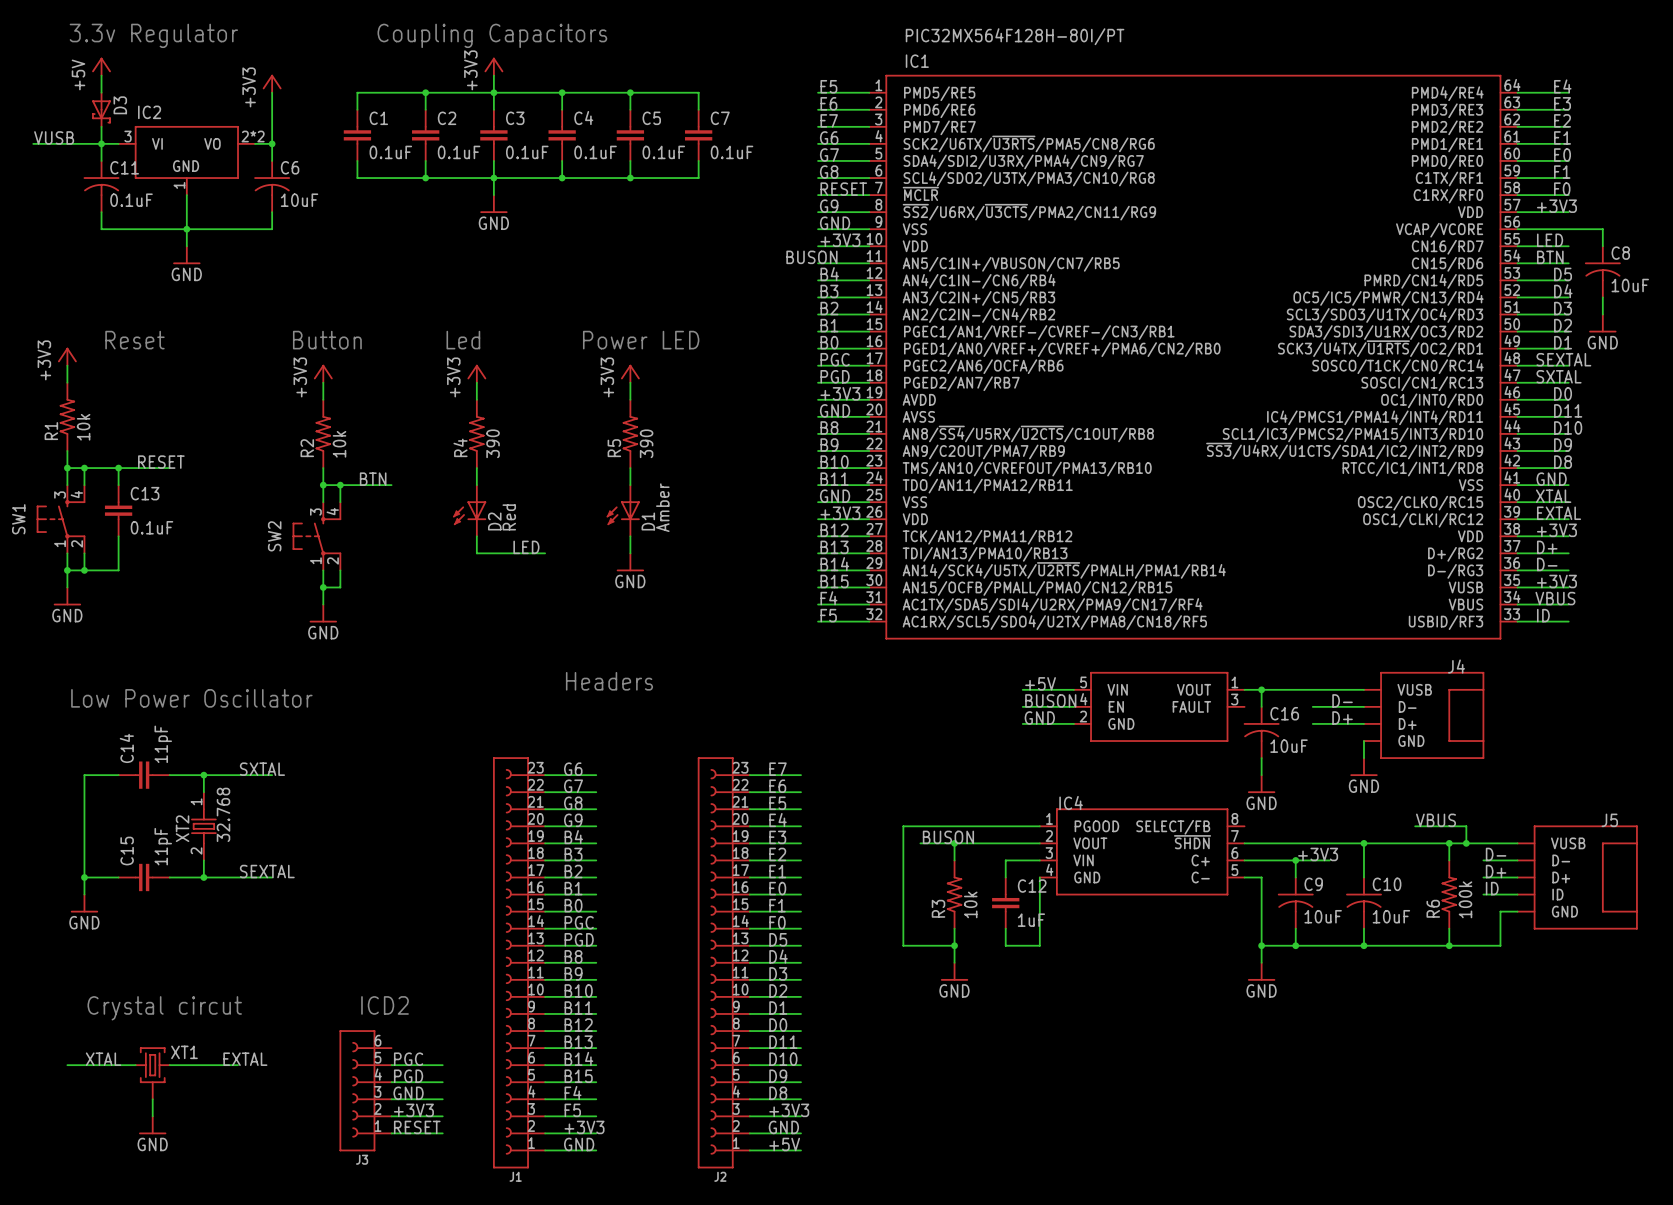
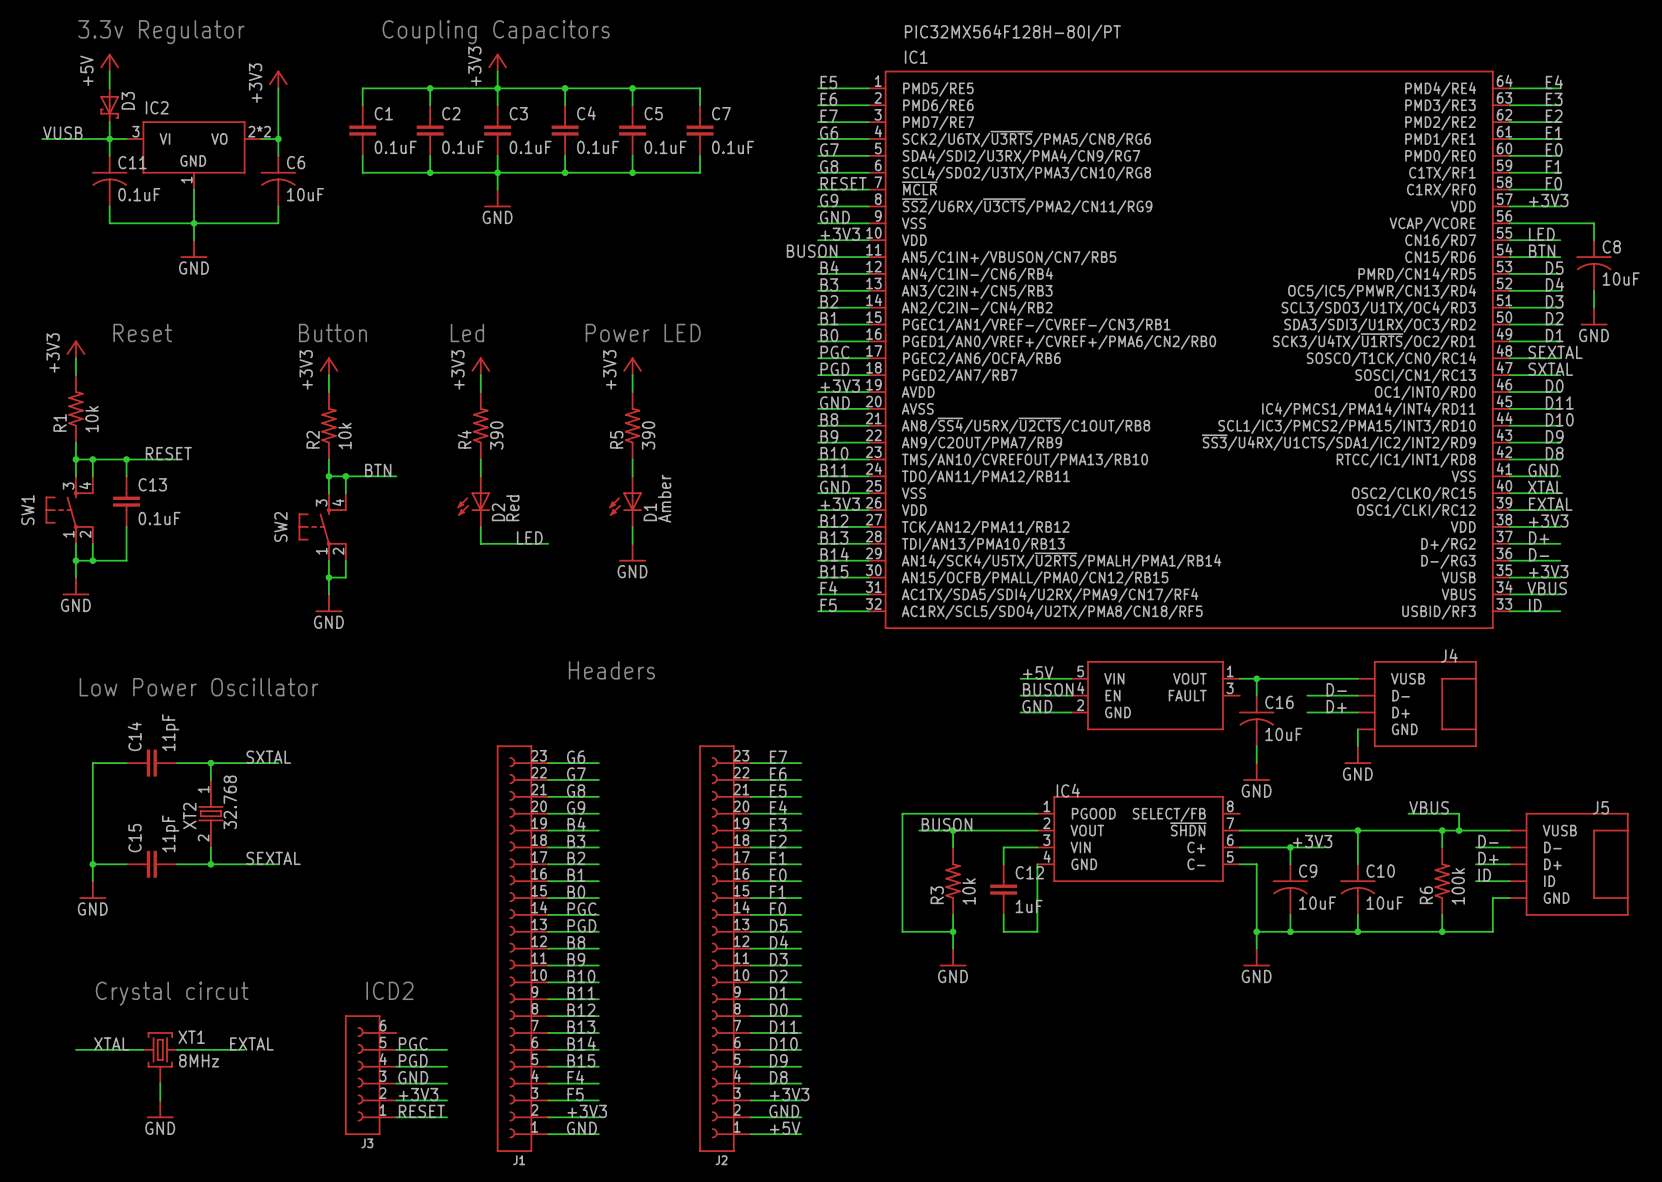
XT1 value: none -> 8MHz (199, 1060)

